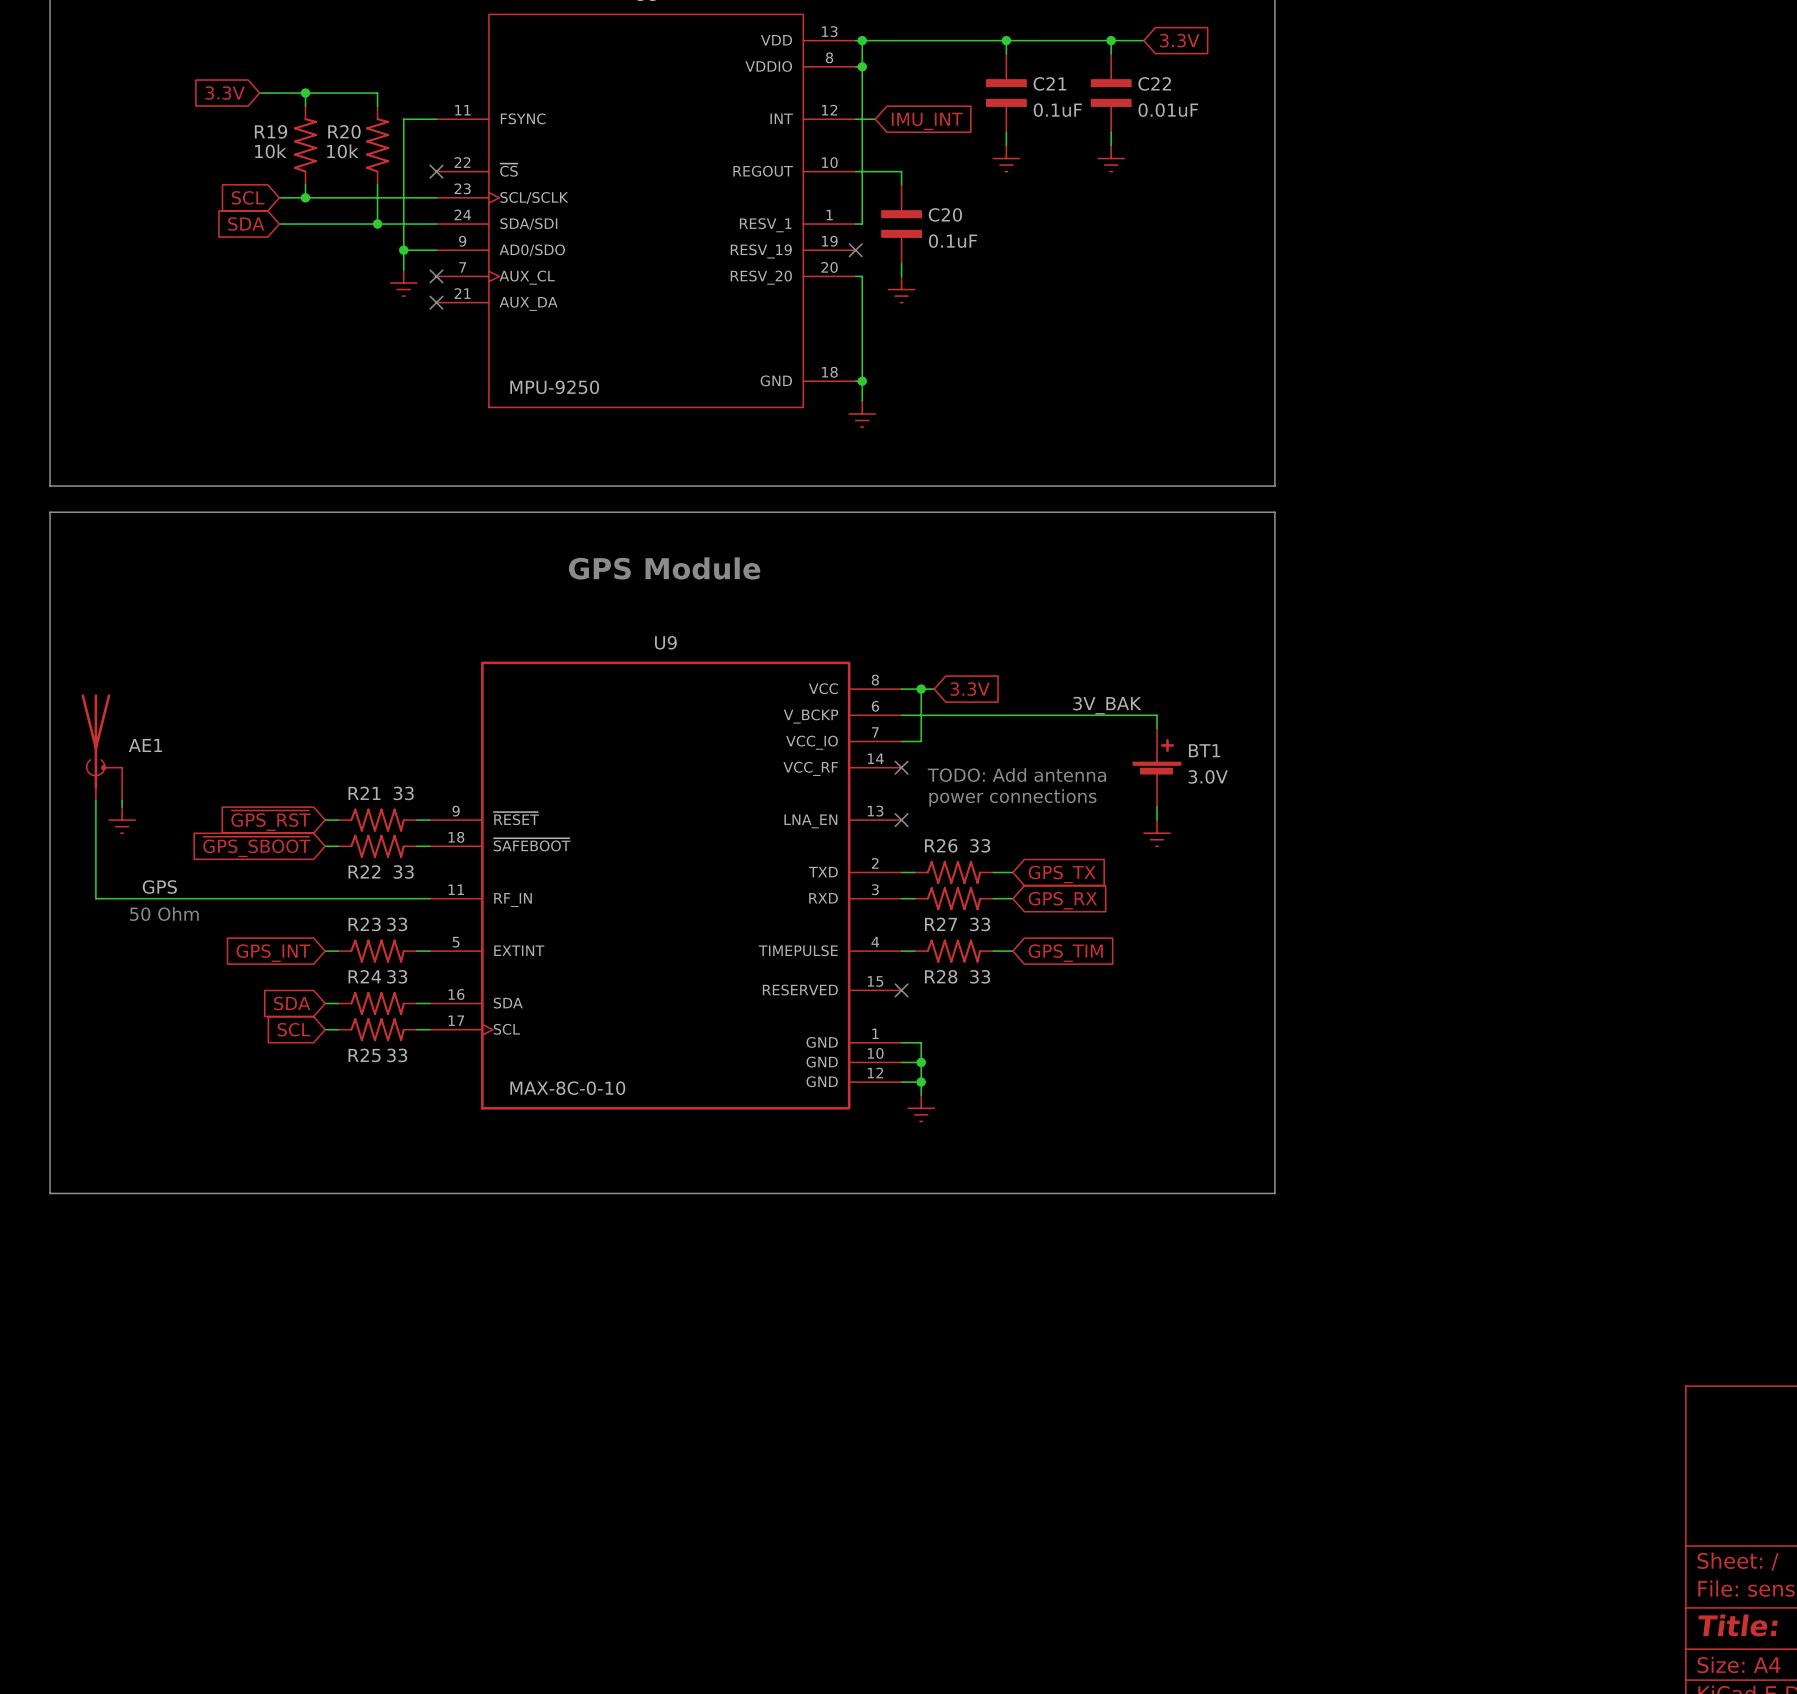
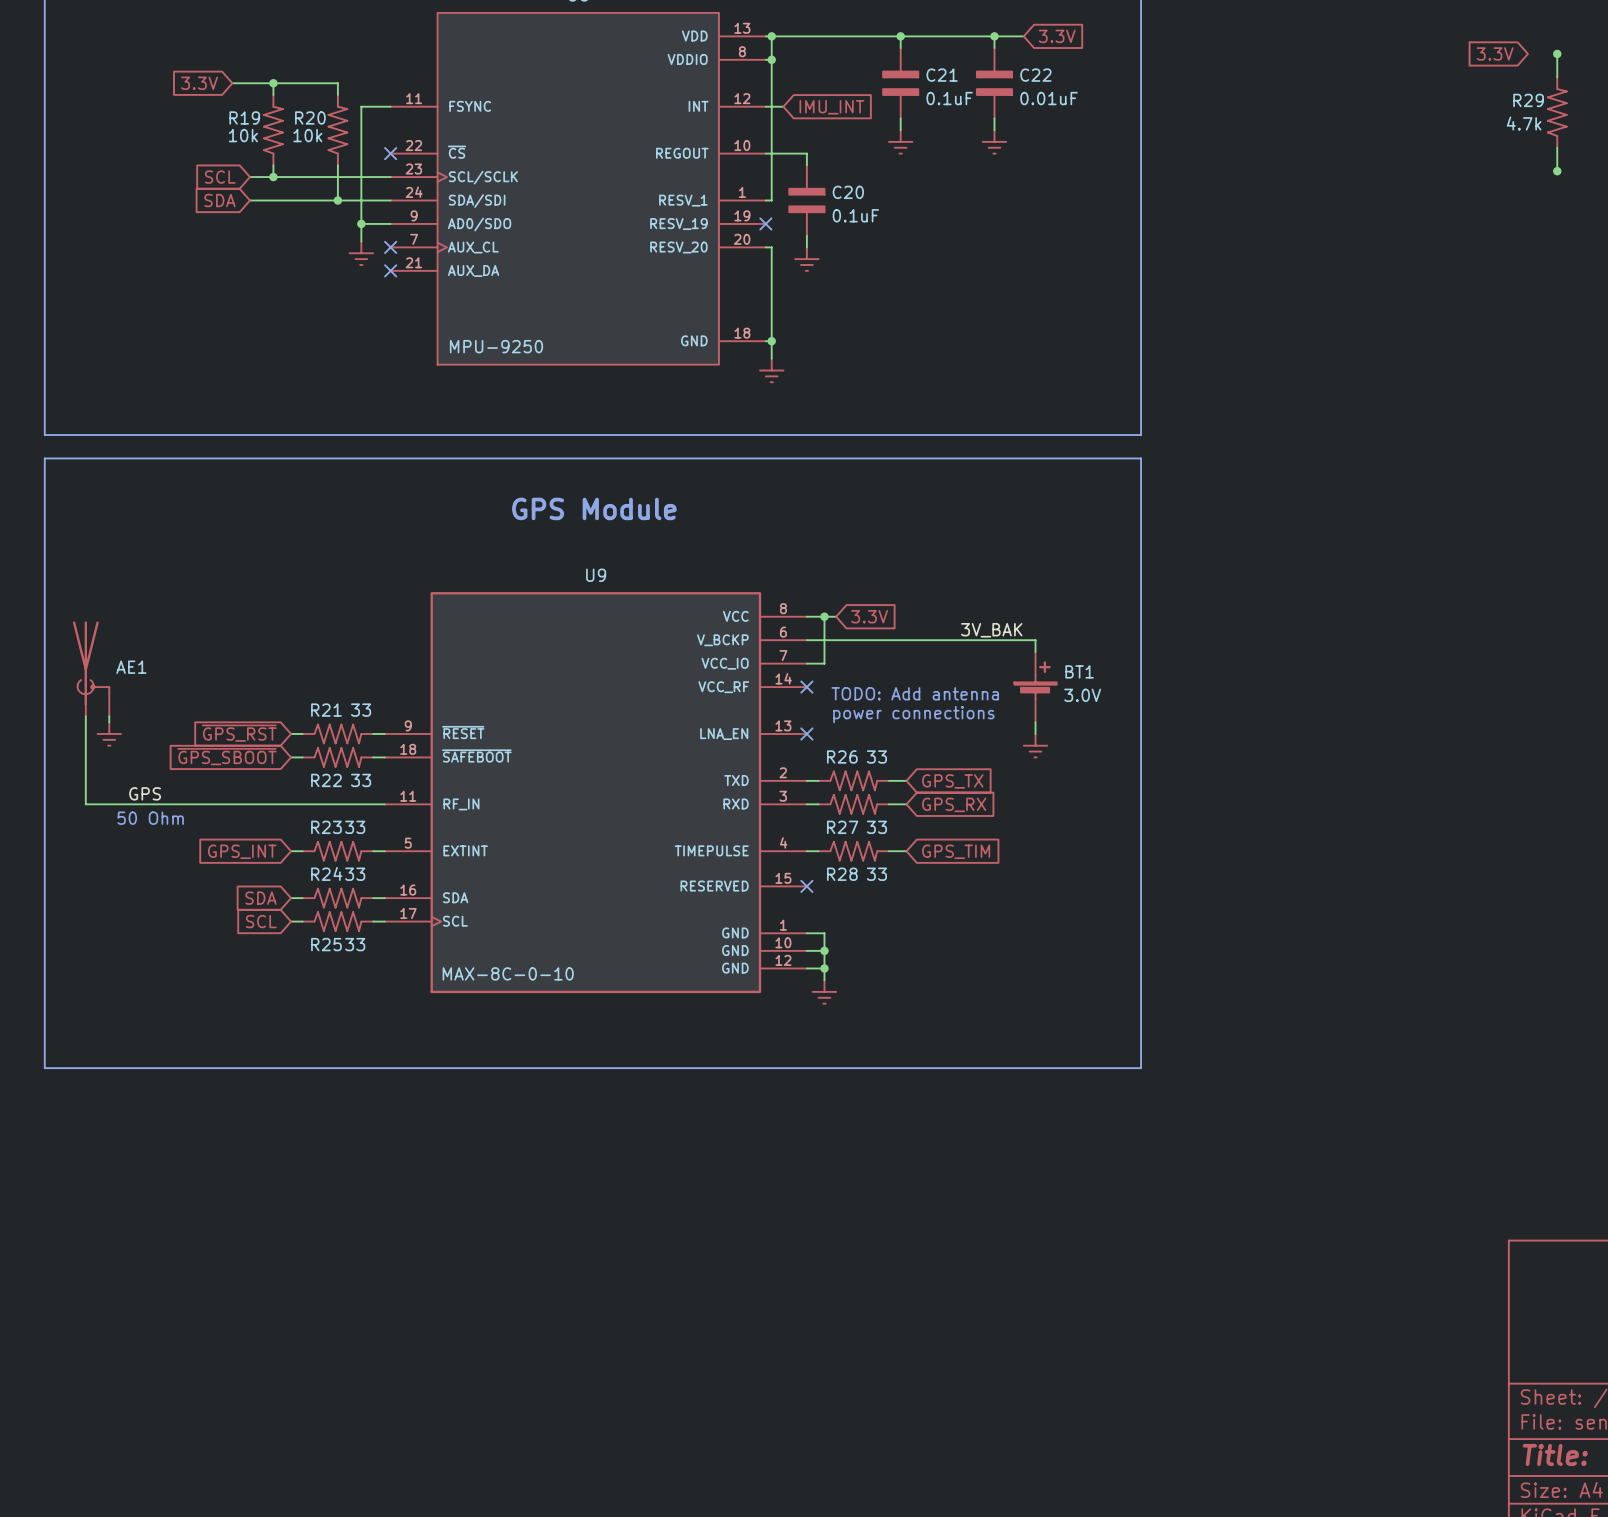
global label: none -> 3.3V (1495, 53)
wire: none -> (1557, 53) (1557, 77)
junction: none -> (1557, 53)
R29: none -> 4.7k (1557, 112)
wire: none -> (1557, 147) (1557, 171)
junction: none -> (1557, 171)

